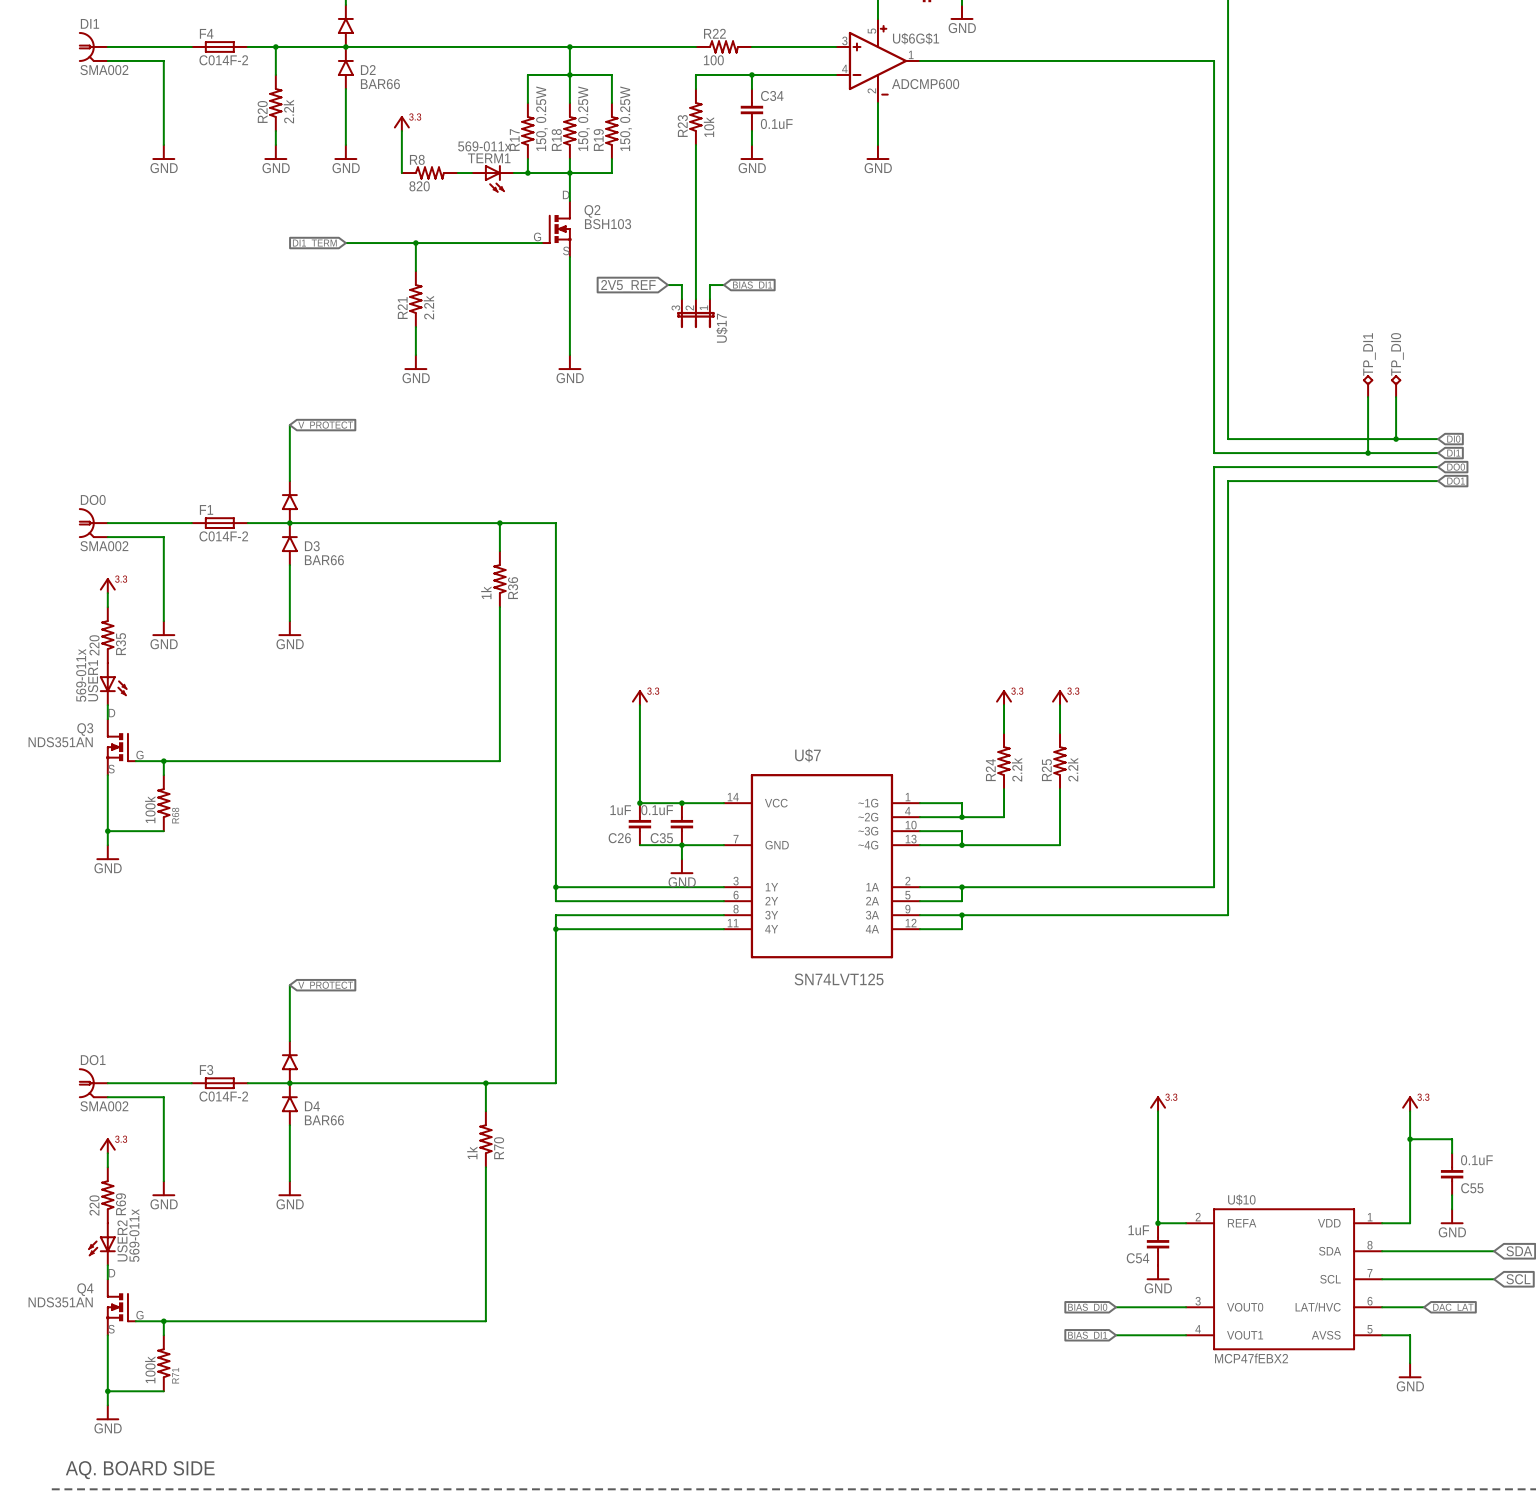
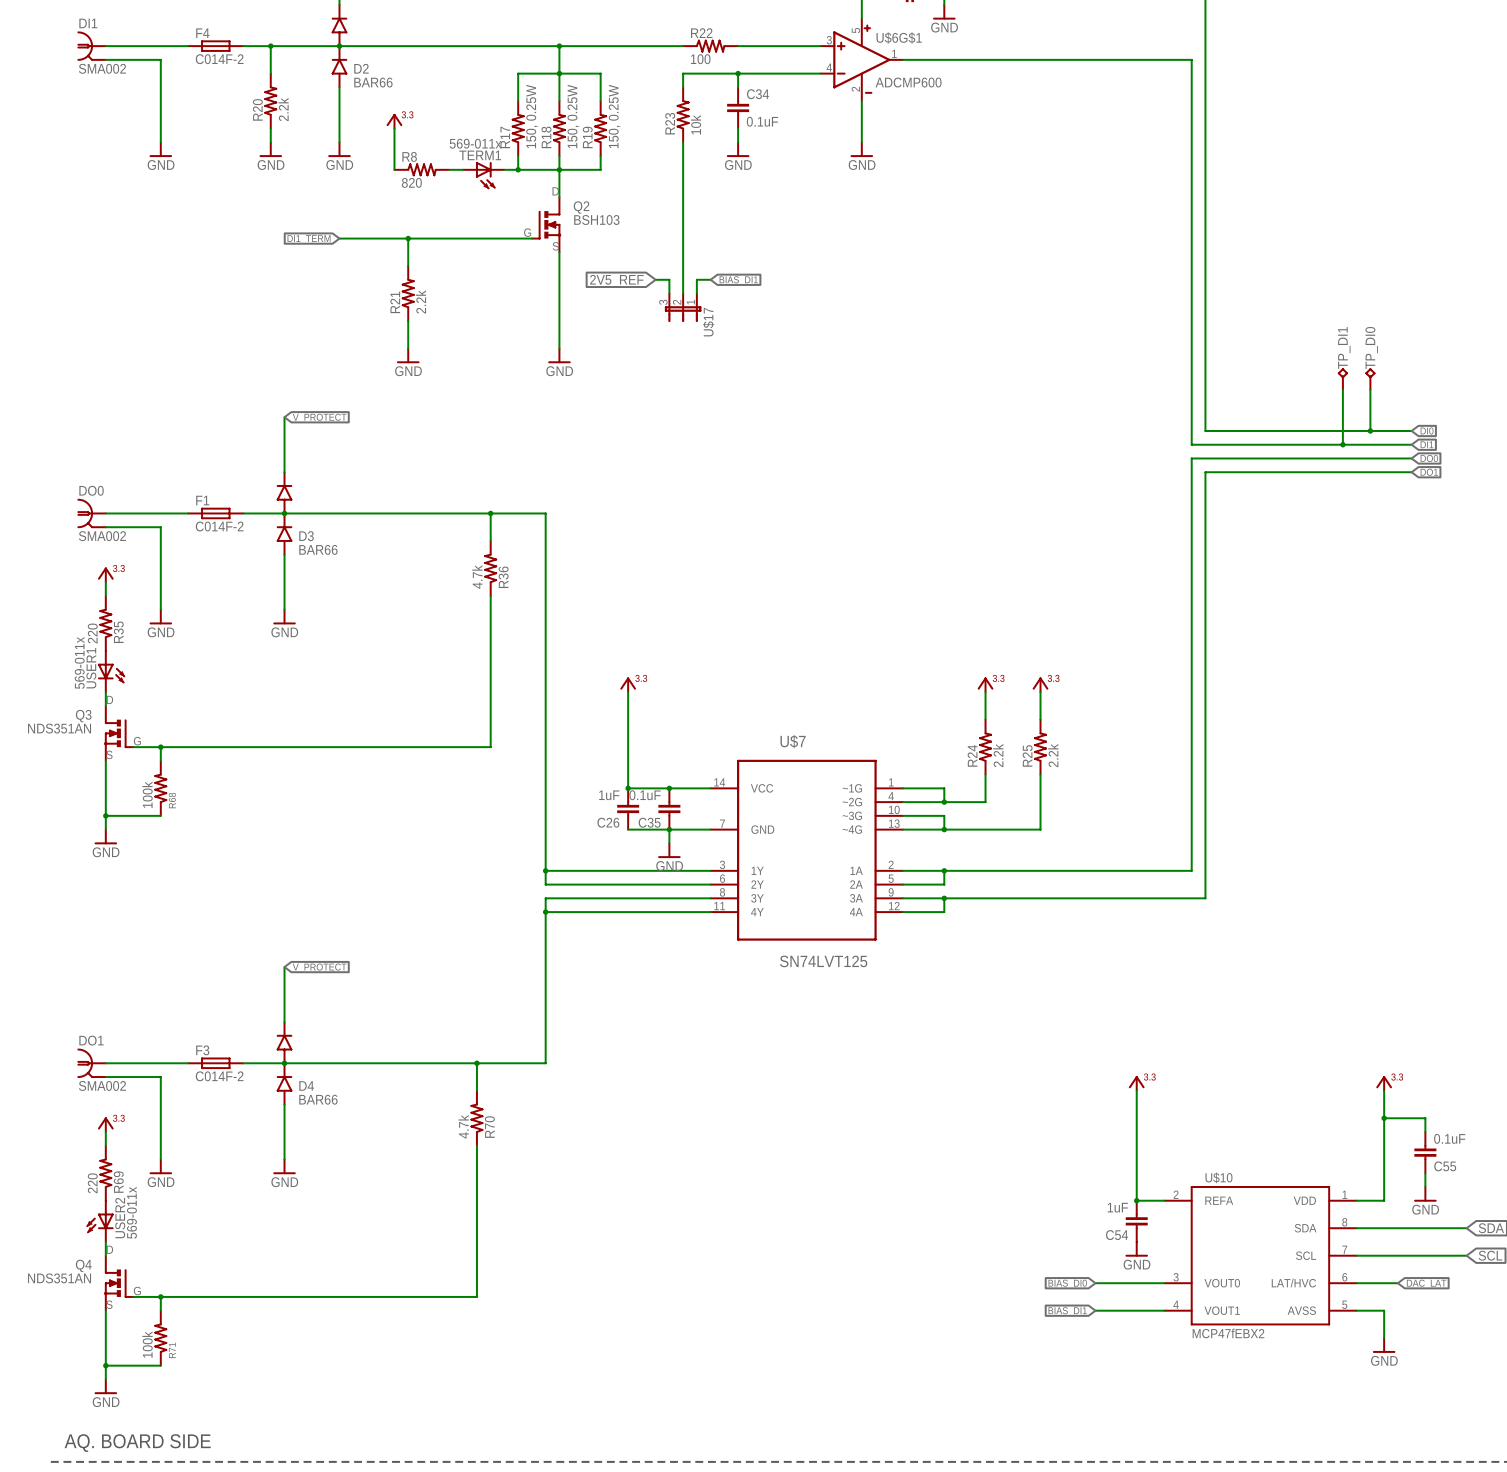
R36 value: 1k (486, 592) -> 4.7k (477, 577)
R70 value: 1k (472, 1152) -> 4.7k (463, 1126)

